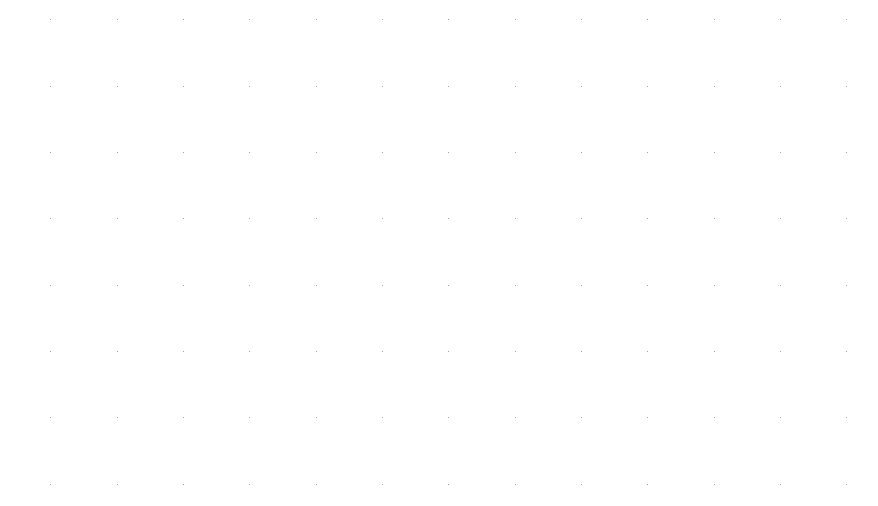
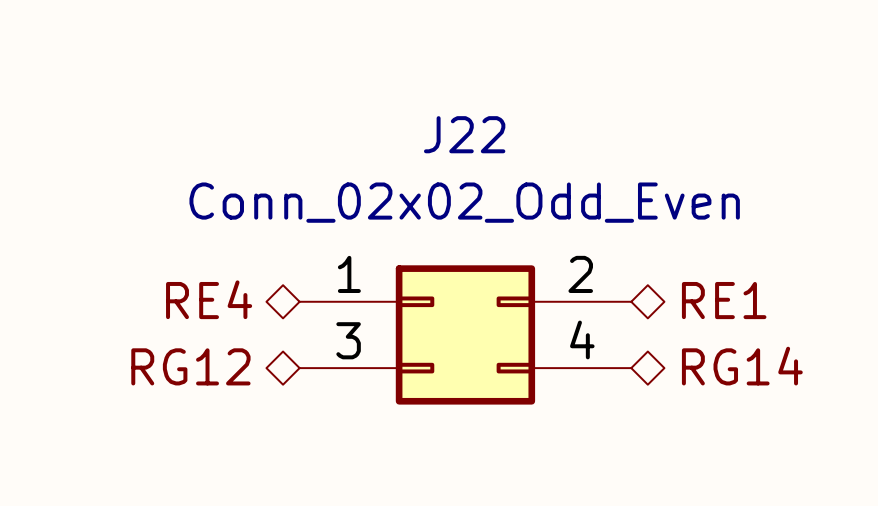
hierarchical label: none -> RE4 (209, 299)
hierarchical label: none -> RE1 (724, 300)
J22: none -> Conn_02x02_Odd_Even (465, 334)
hierarchical label: none -> RG12 (190, 366)
hierarchical label: none -> RG14 (742, 366)

